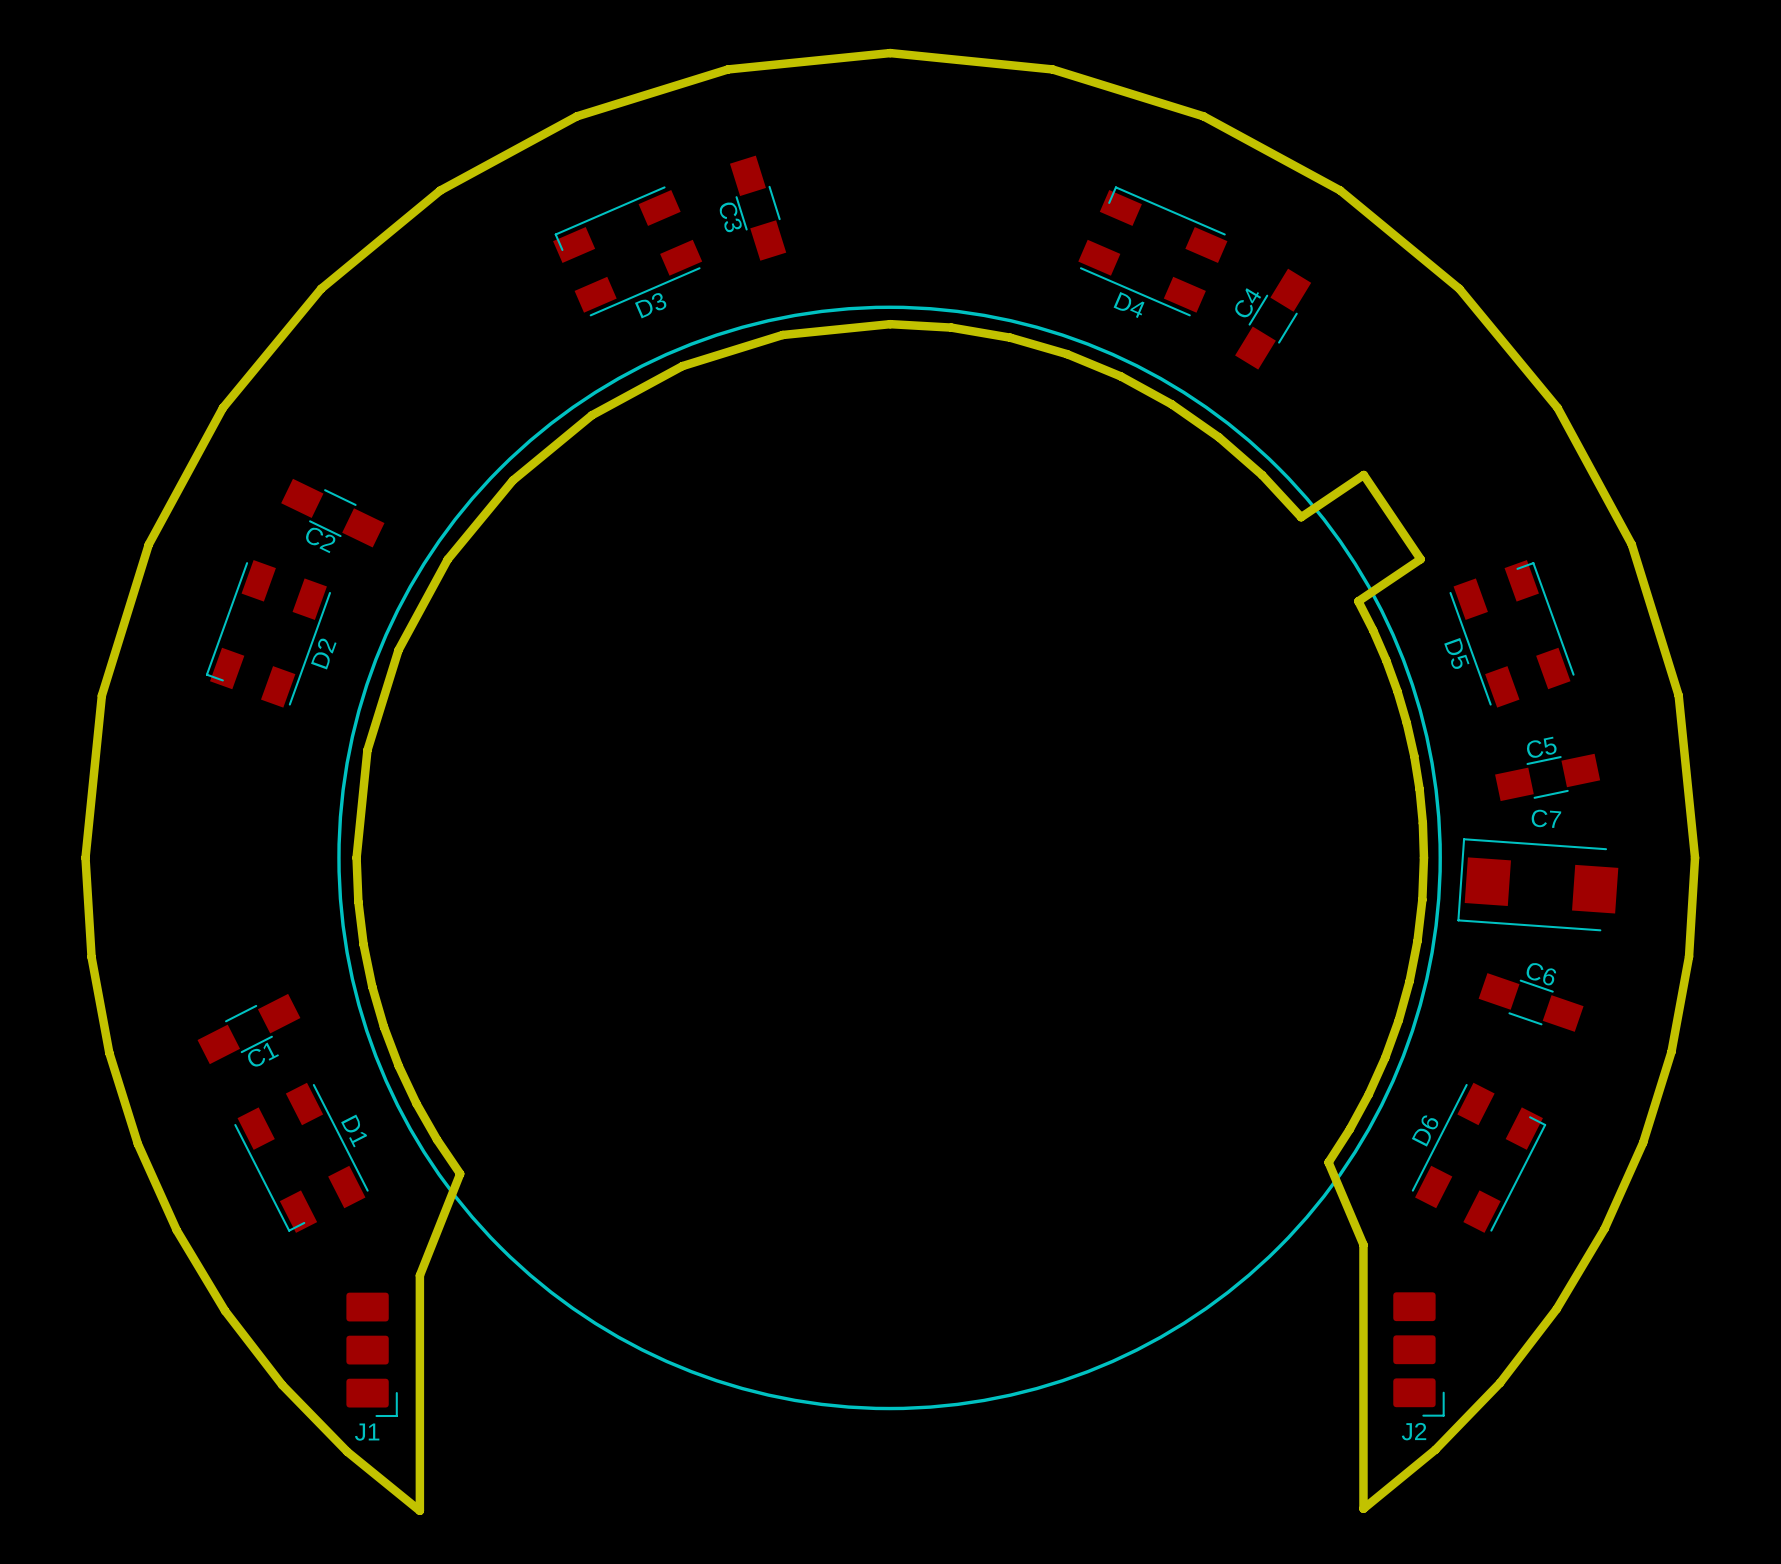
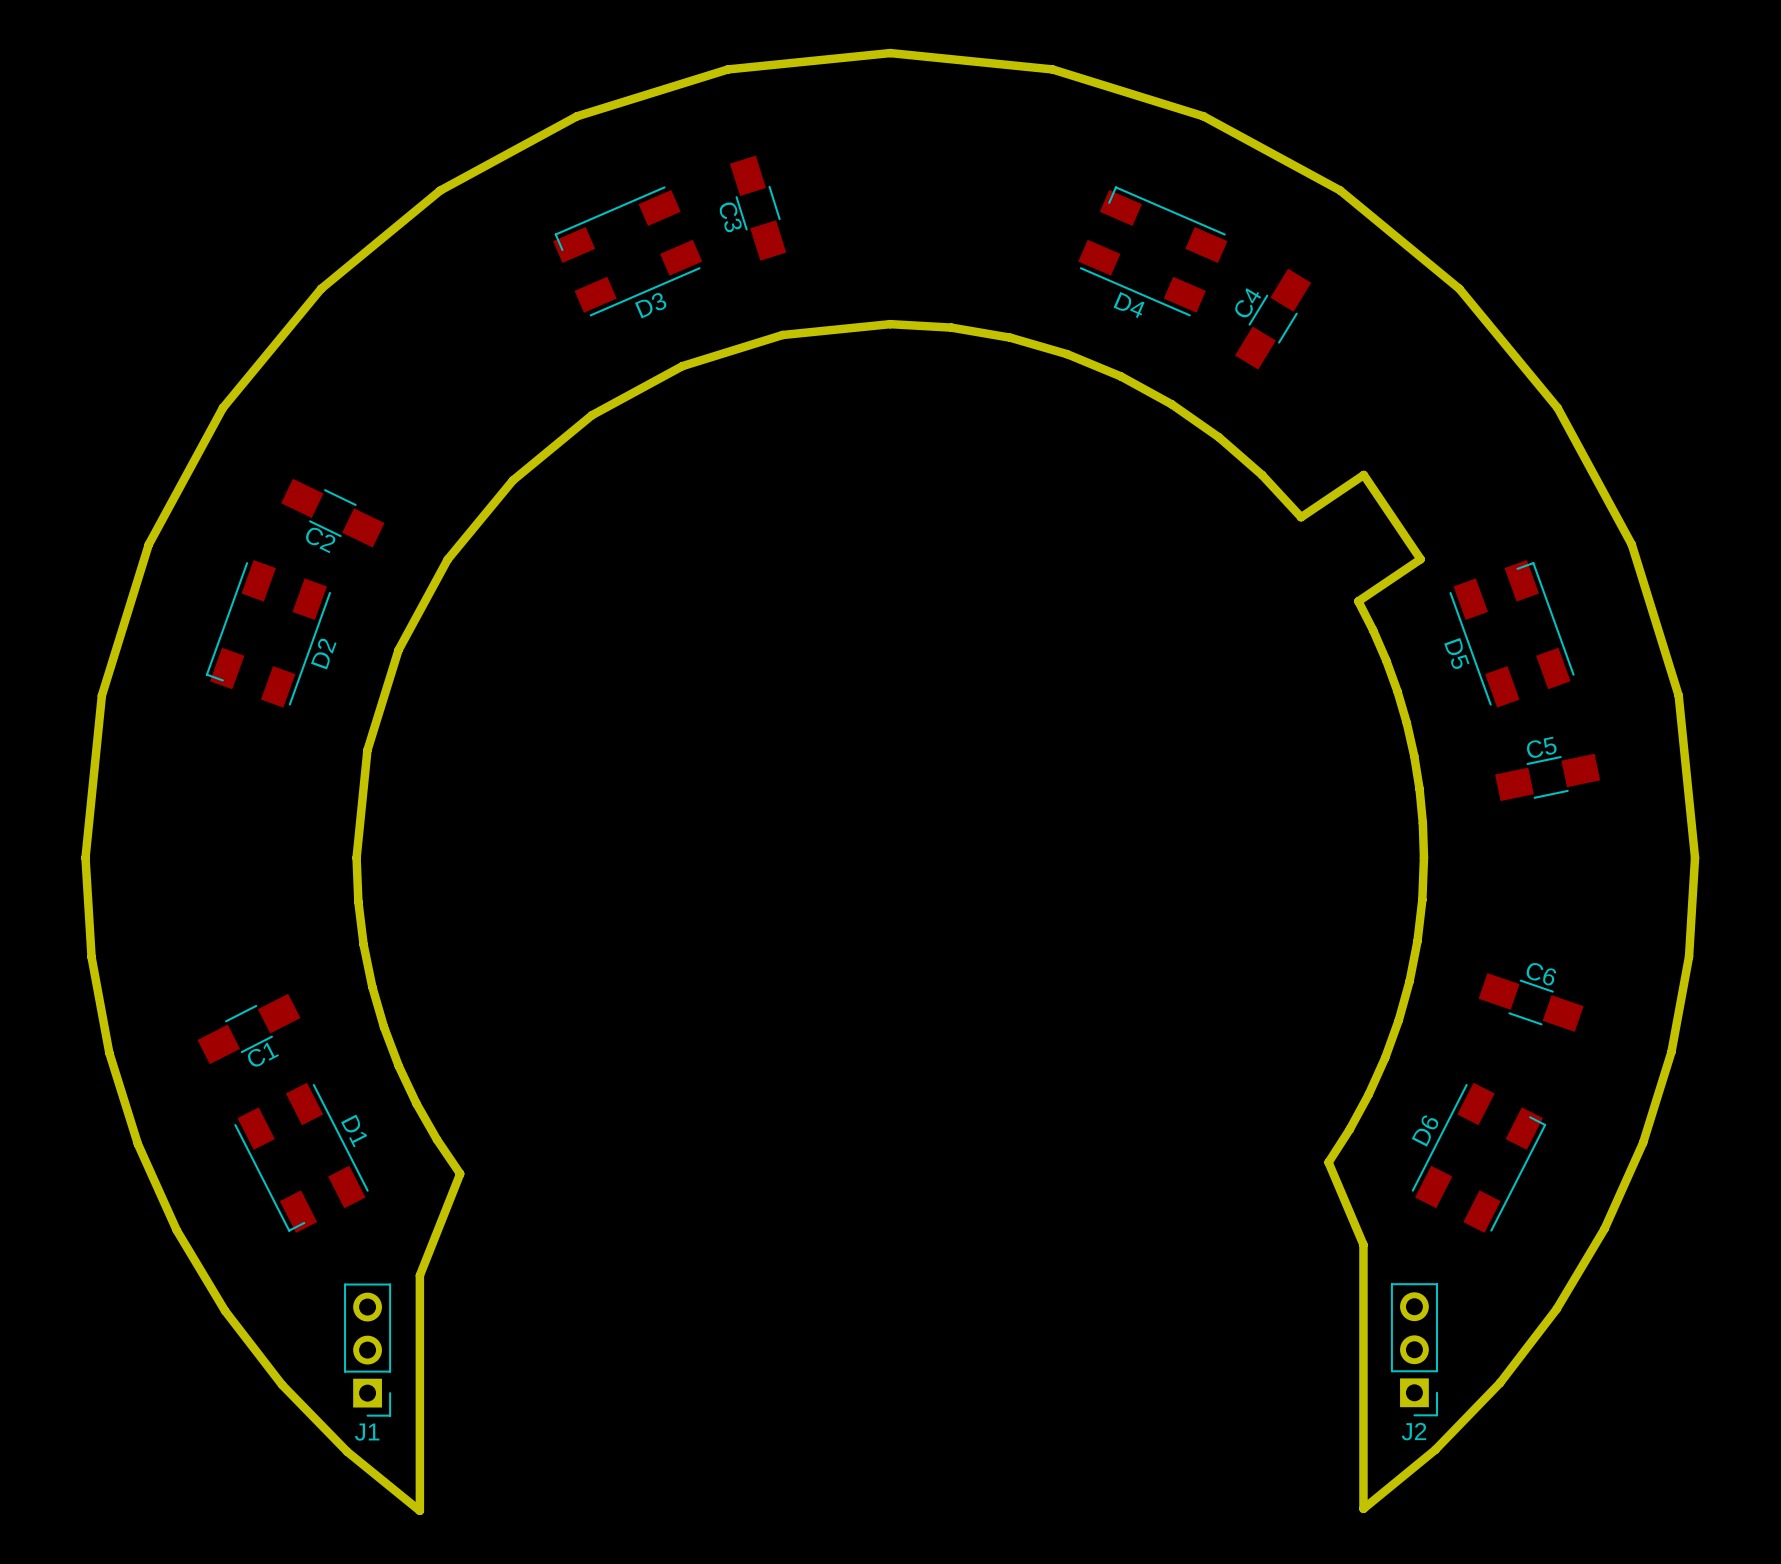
drawing: [337, 305, 1442, 1411] -> none
C7: (1537, 884) -> none
J1 footprint: [346, 1292, 398, 1418] -> [344, 1283, 392, 1417]
J2 footprint: [1393, 1292, 1445, 1417] -> [1390, 1283, 1438, 1417]

